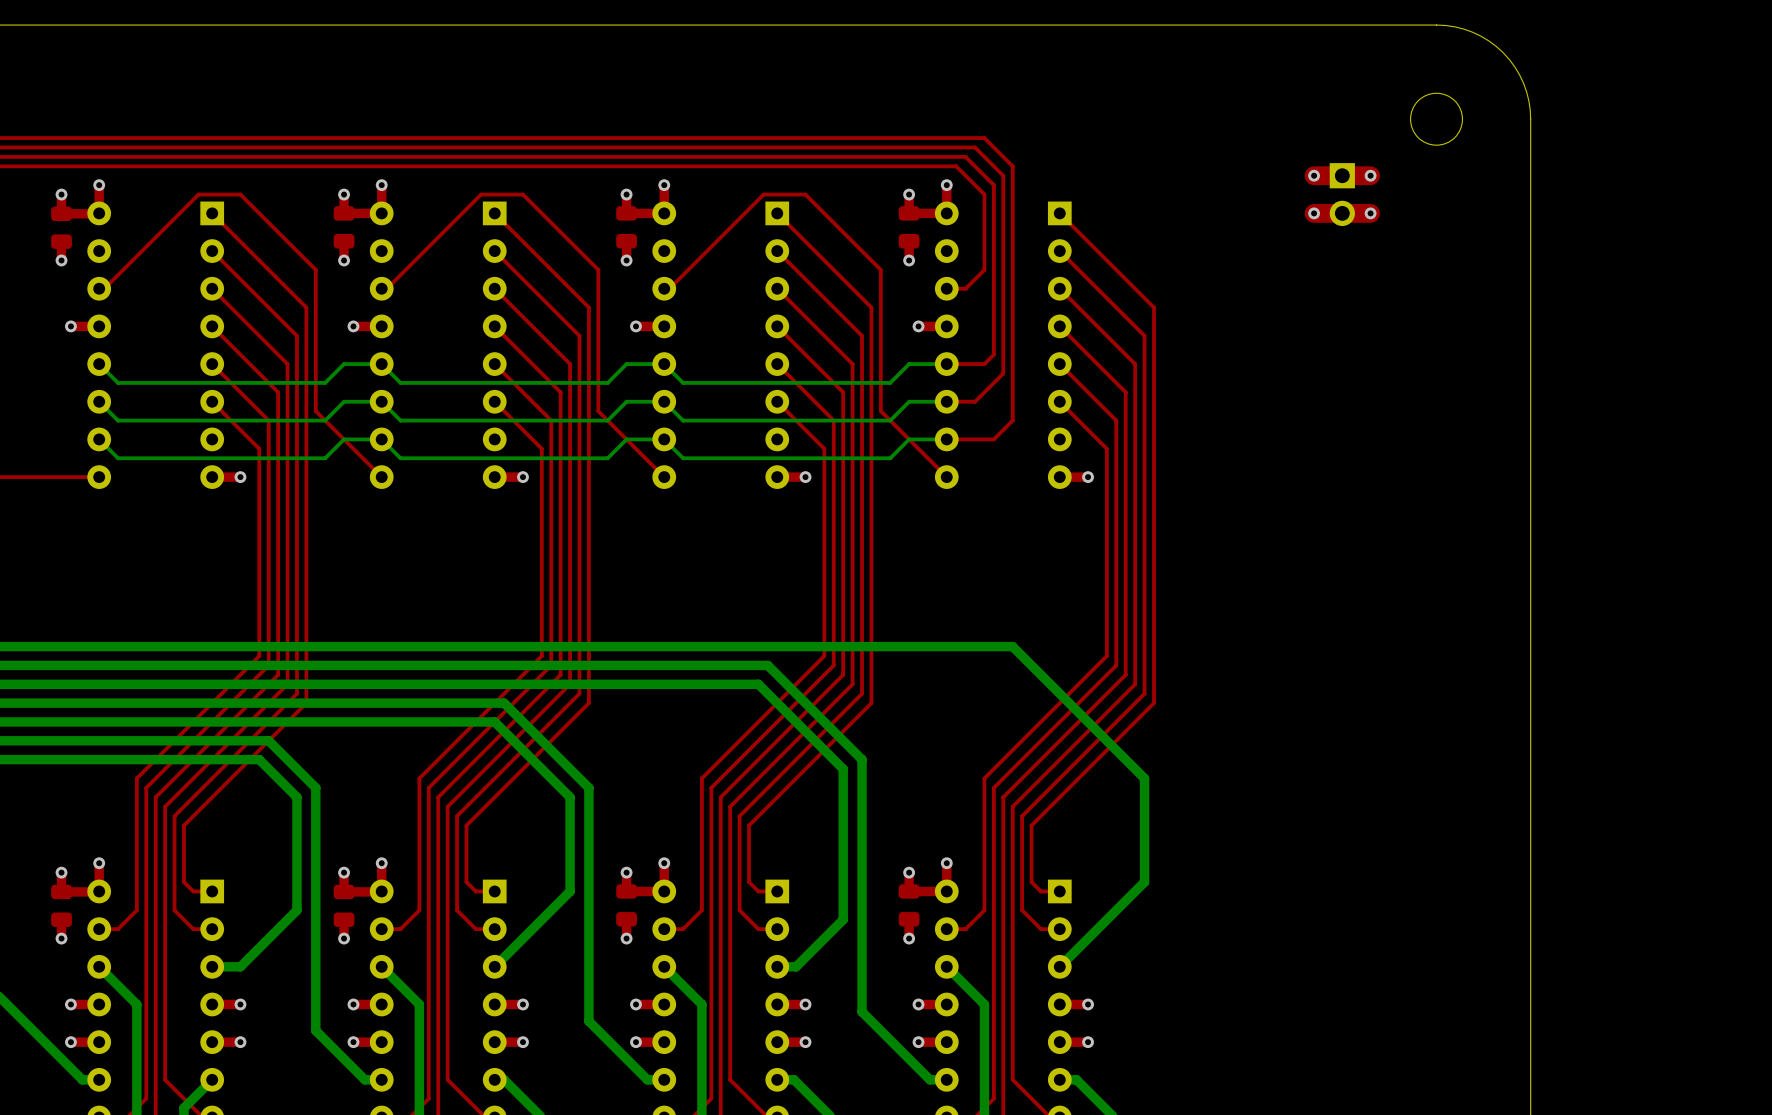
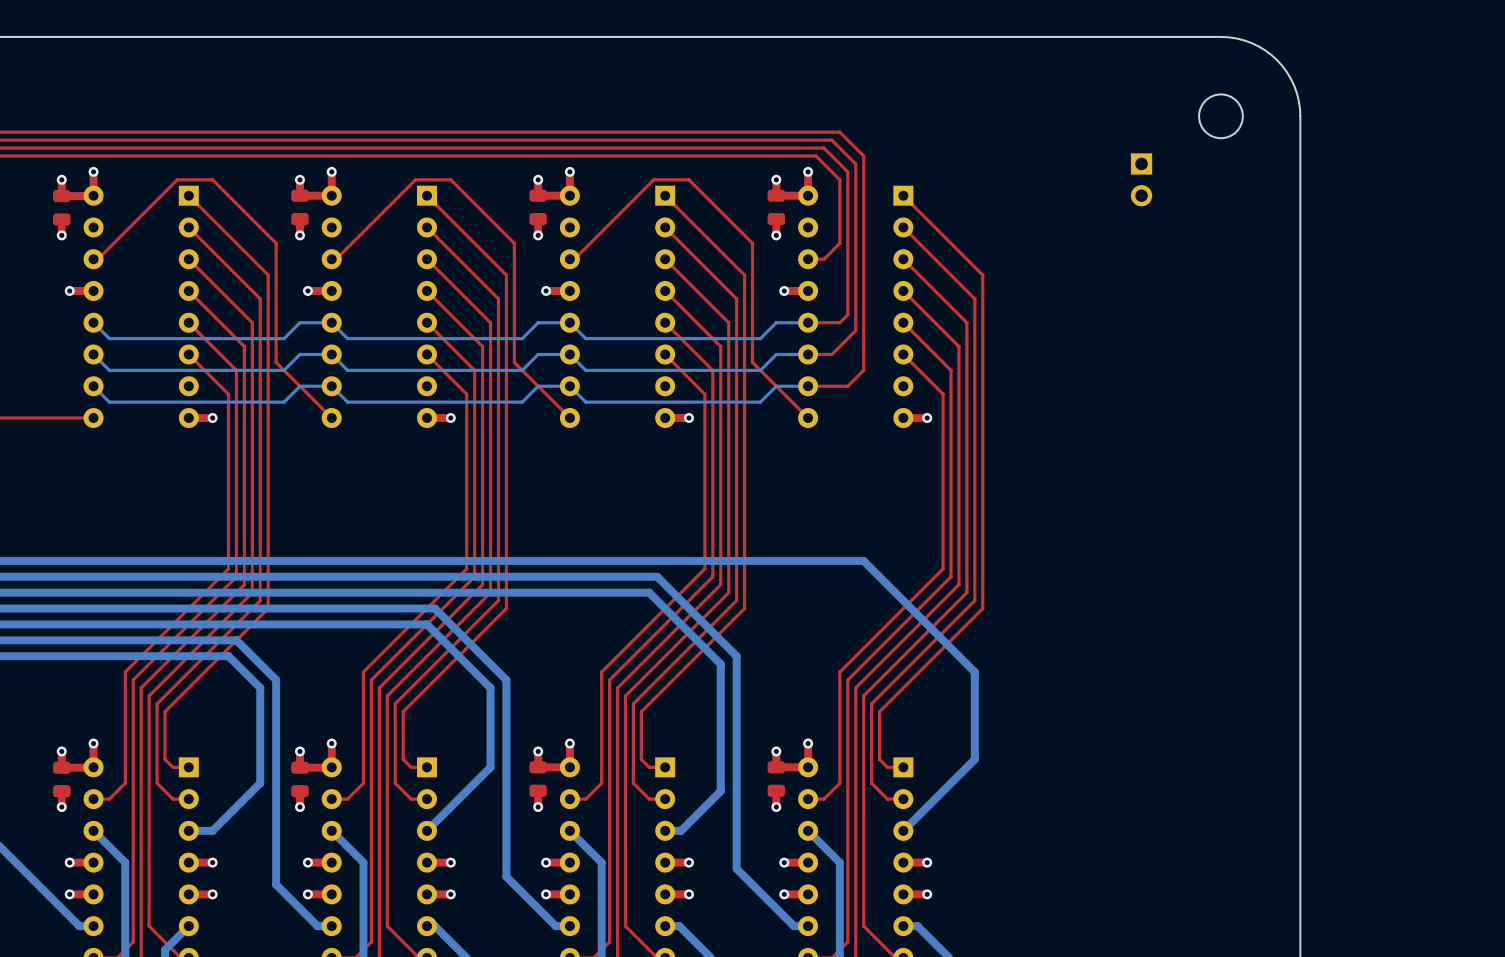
via: (1314, 175) -> none
top track: (1370, 175) (1314, 175) -> none
via: (1370, 175) -> none
via: (1314, 213) -> none
top track: (1370, 213) (1314, 213) -> none
via: (1370, 213) -> none

